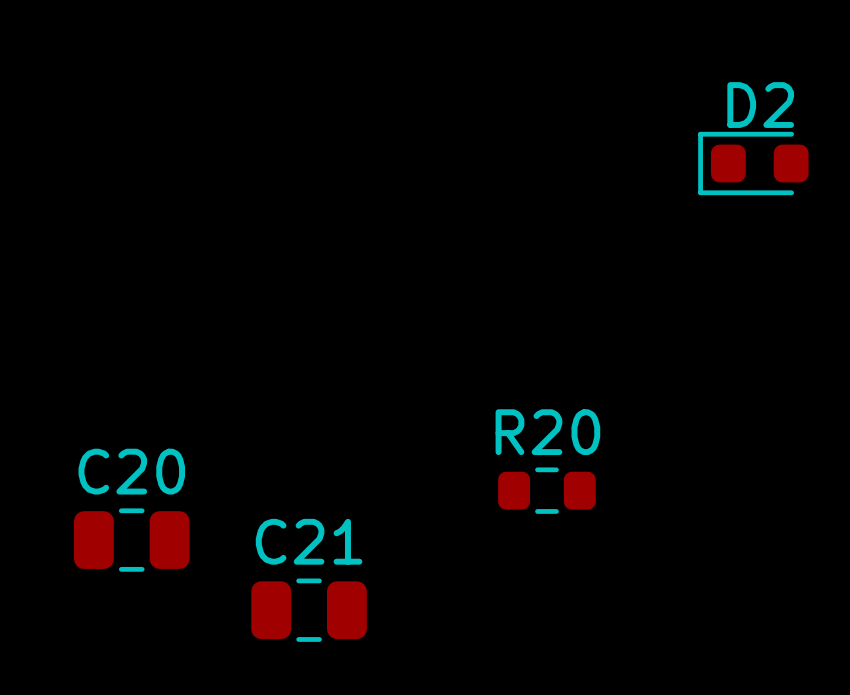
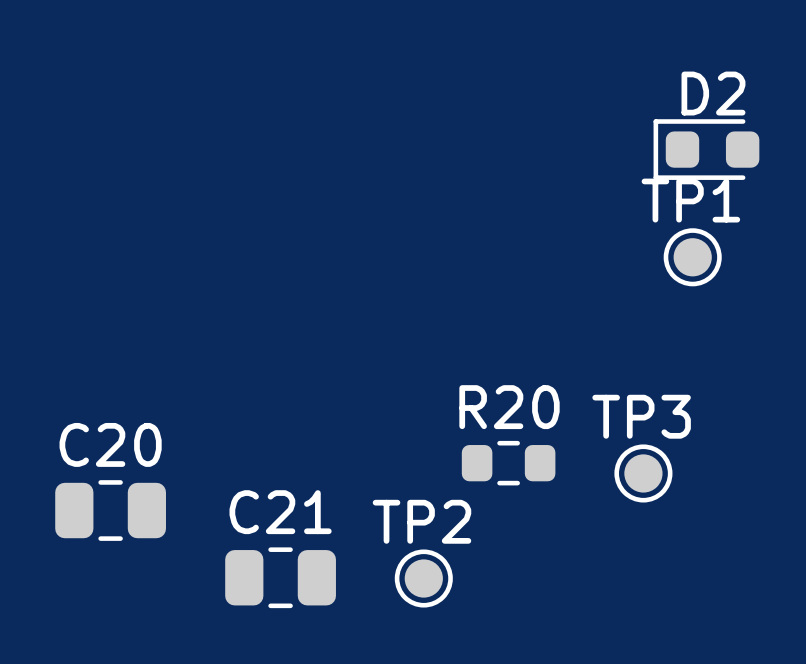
TP1: none -> (692, 257)
TP3: none -> (643, 473)
TP2: none -> (423, 578)

